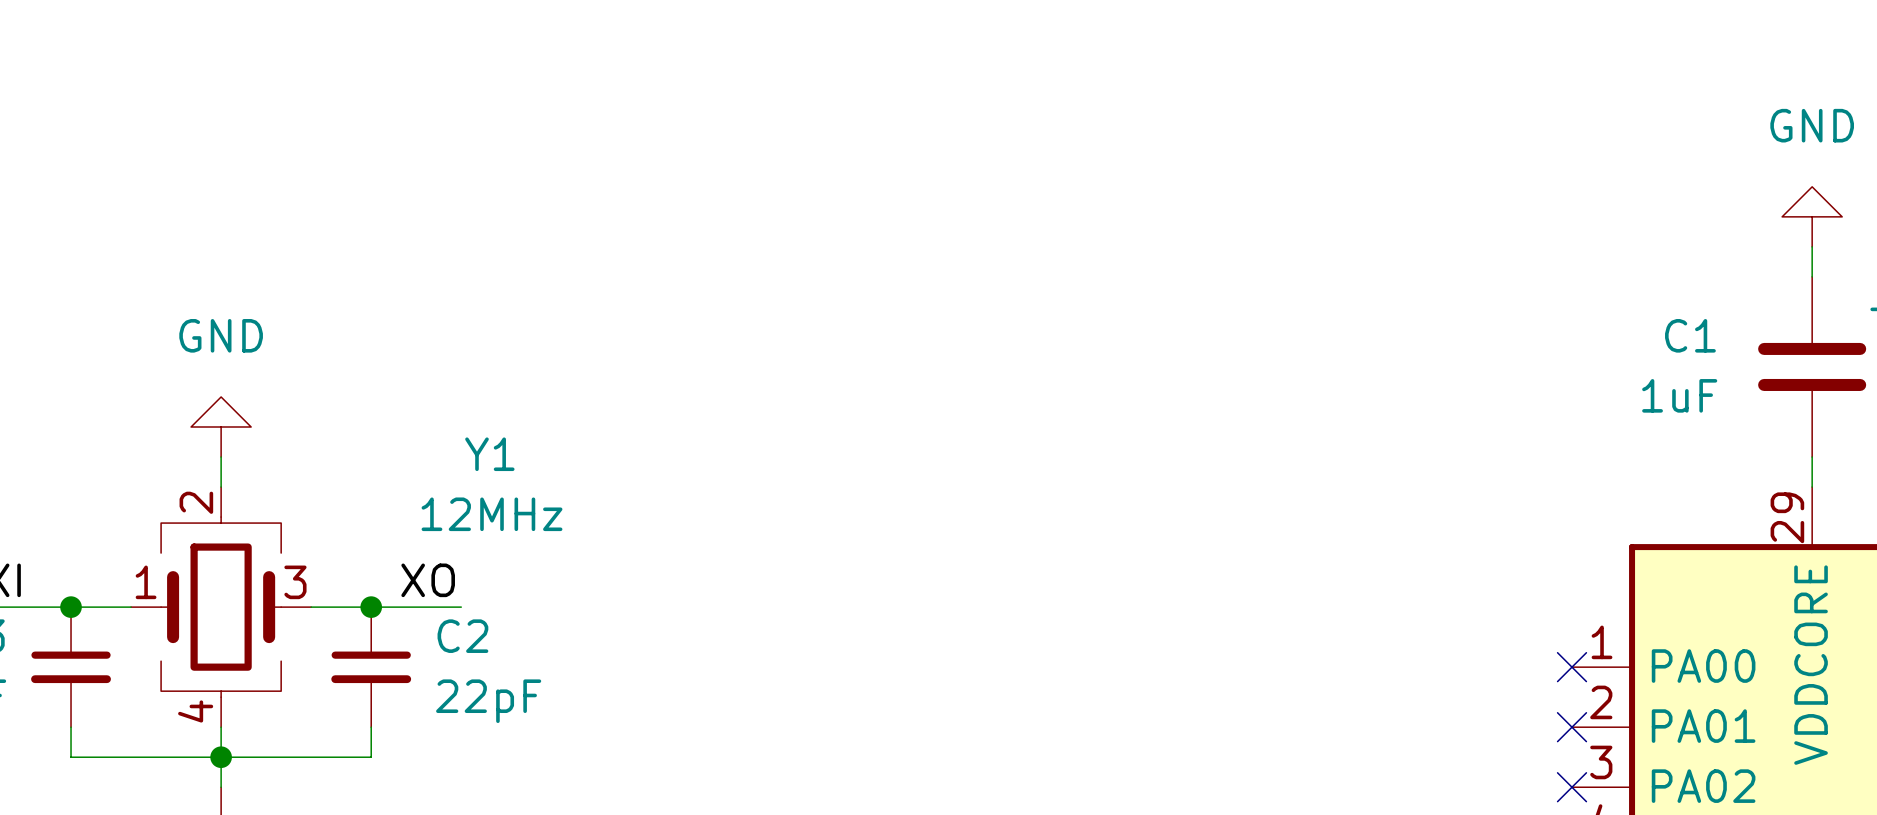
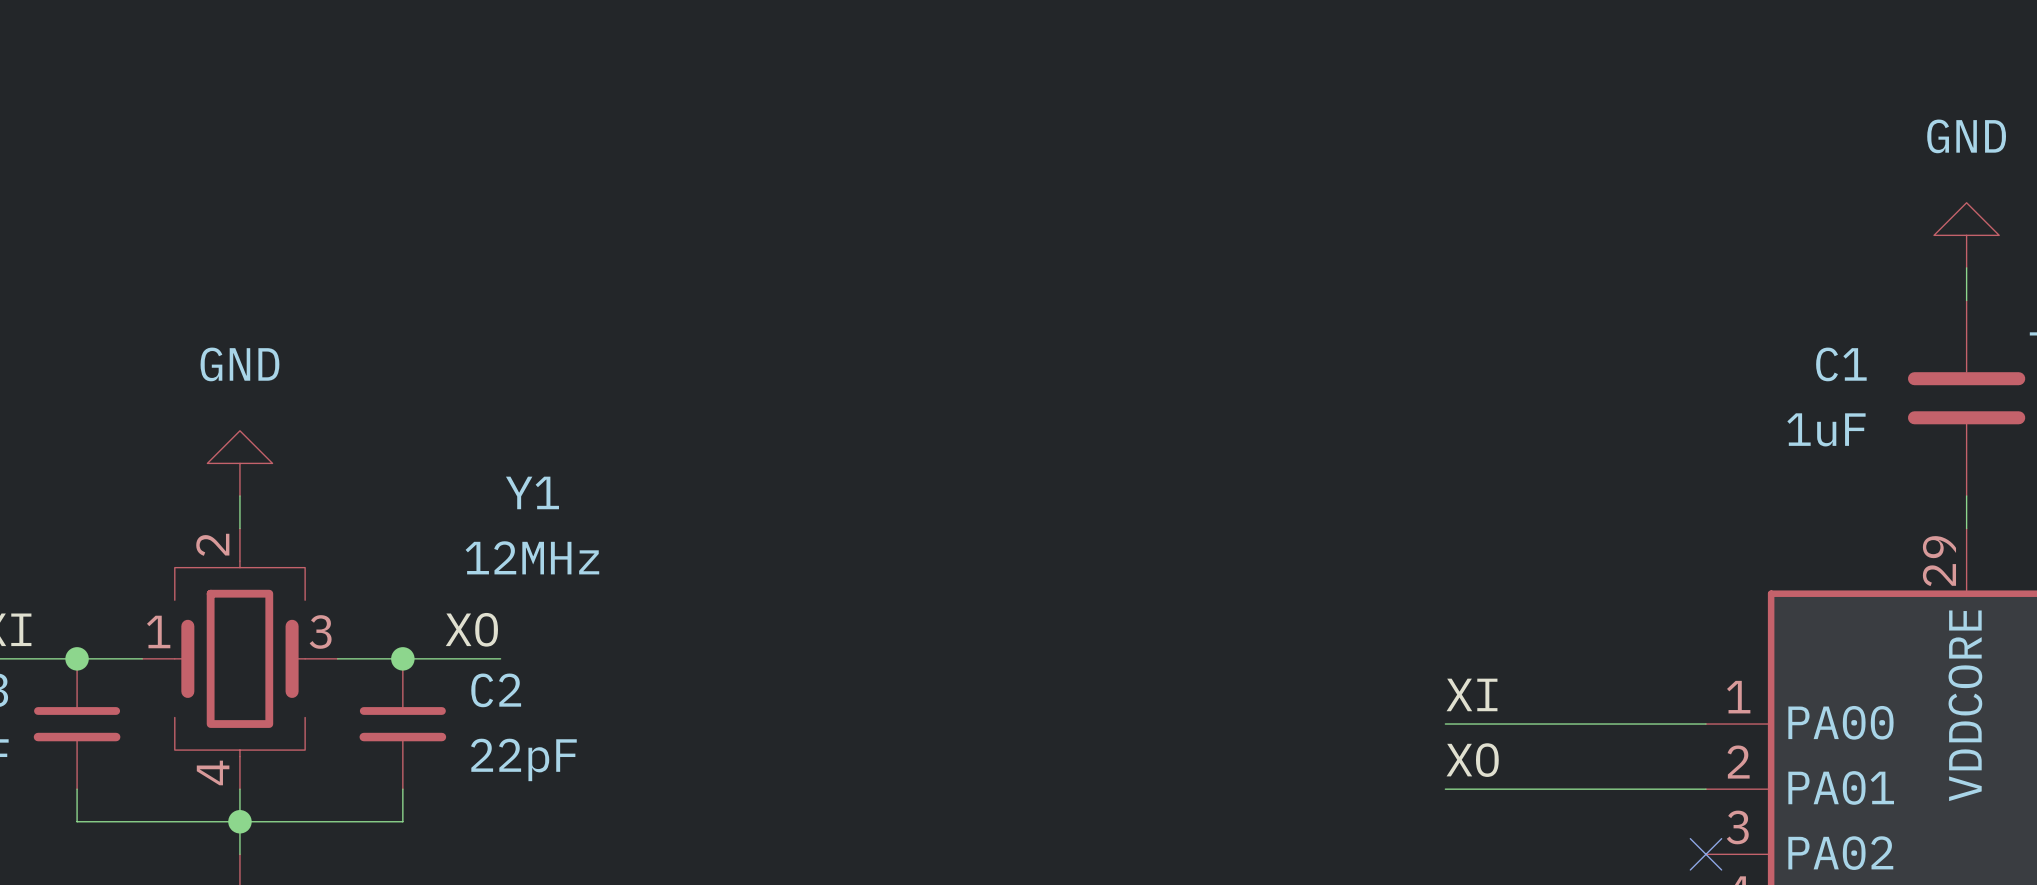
label: none -> XI (1472, 694)
wire: none -> (1445, 724) (1705, 724)
no-connect mark: (1572, 667) -> none
label: none -> XO (1472, 760)
wire: none -> (1445, 789) (1705, 789)
no-connect mark: (1572, 727) -> none

